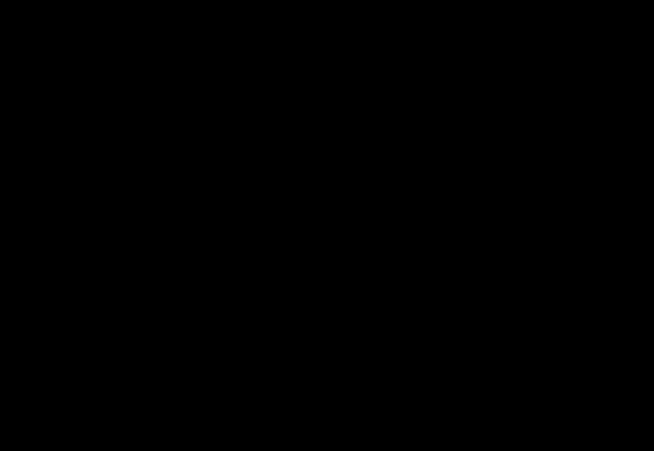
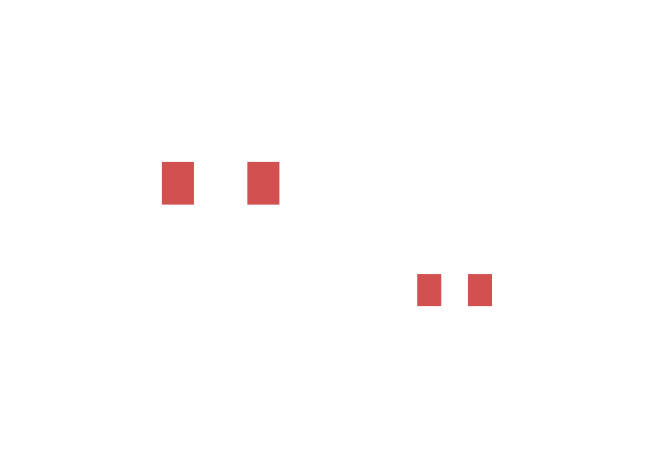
part: none -> (220, 183)
part: none -> (454, 290)

